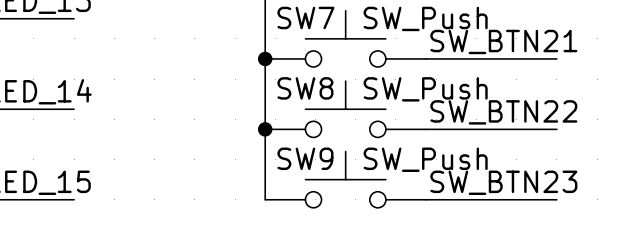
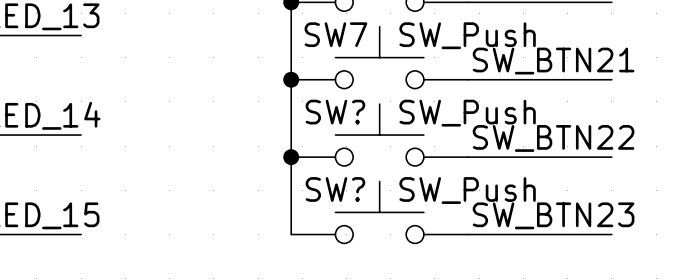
SW8 name: SW8 (305, 88) -> SW? (335, 112)
SW9 name: SW9 (305, 158) -> SW? (335, 189)

